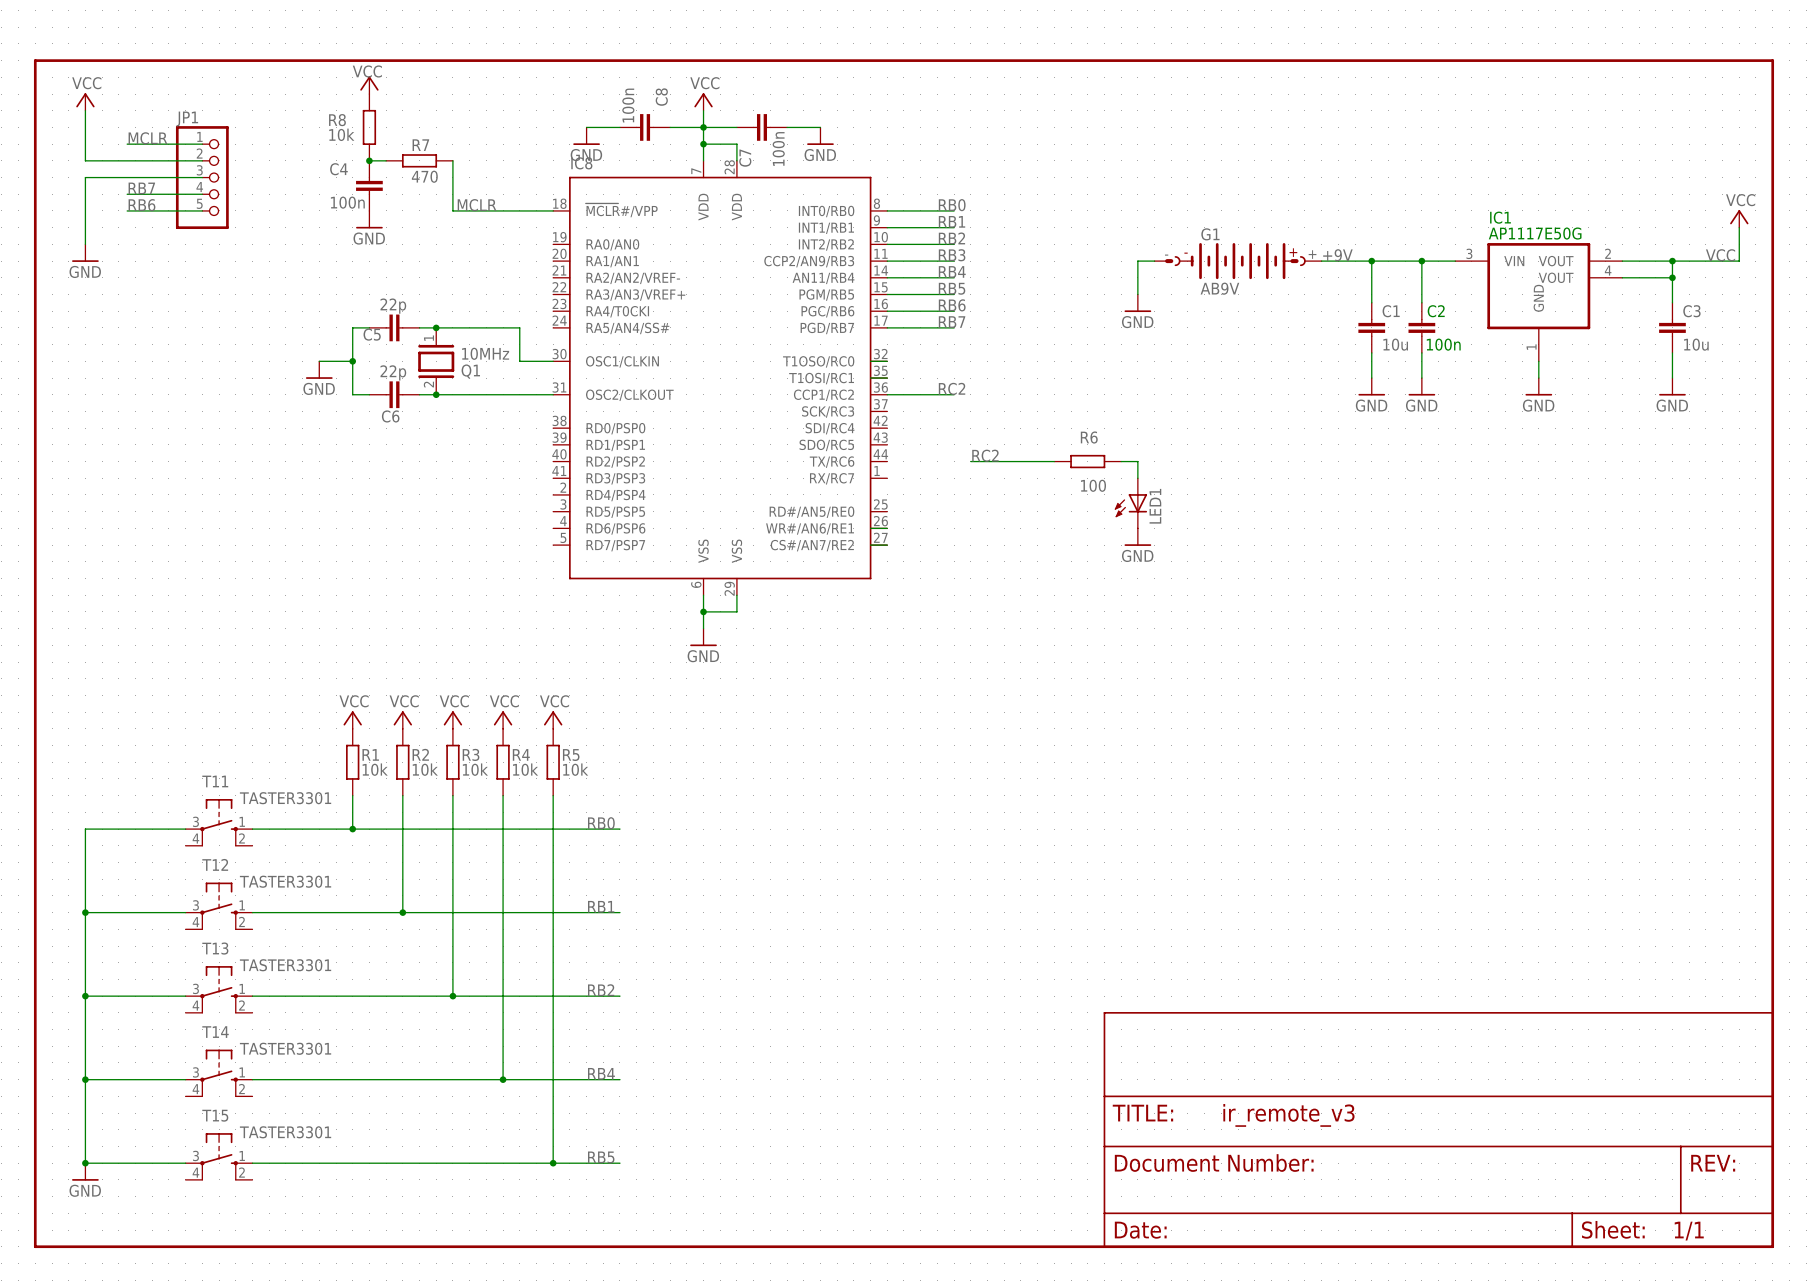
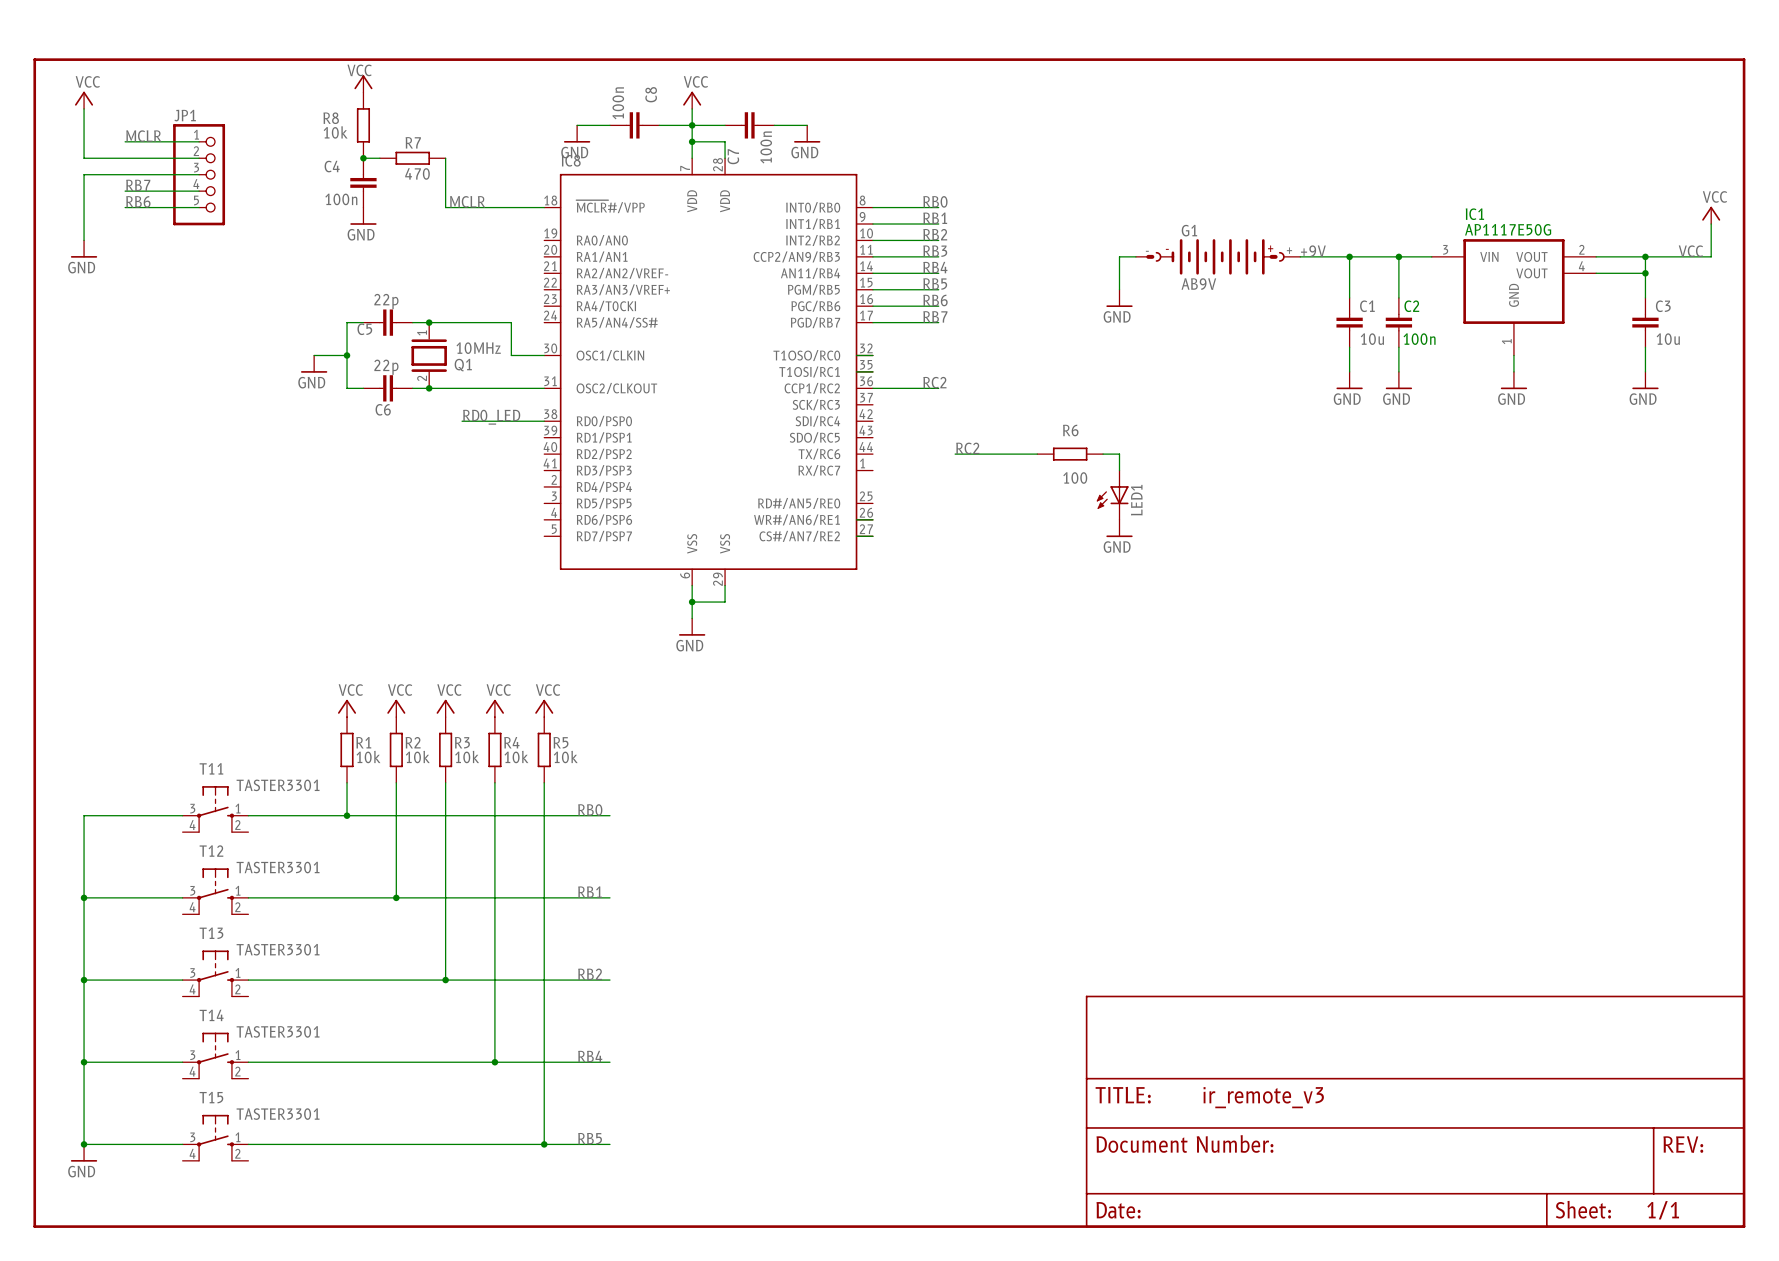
label: none -> RD0_LED (491, 417)
wire: none -> (462, 421) (544, 421)

